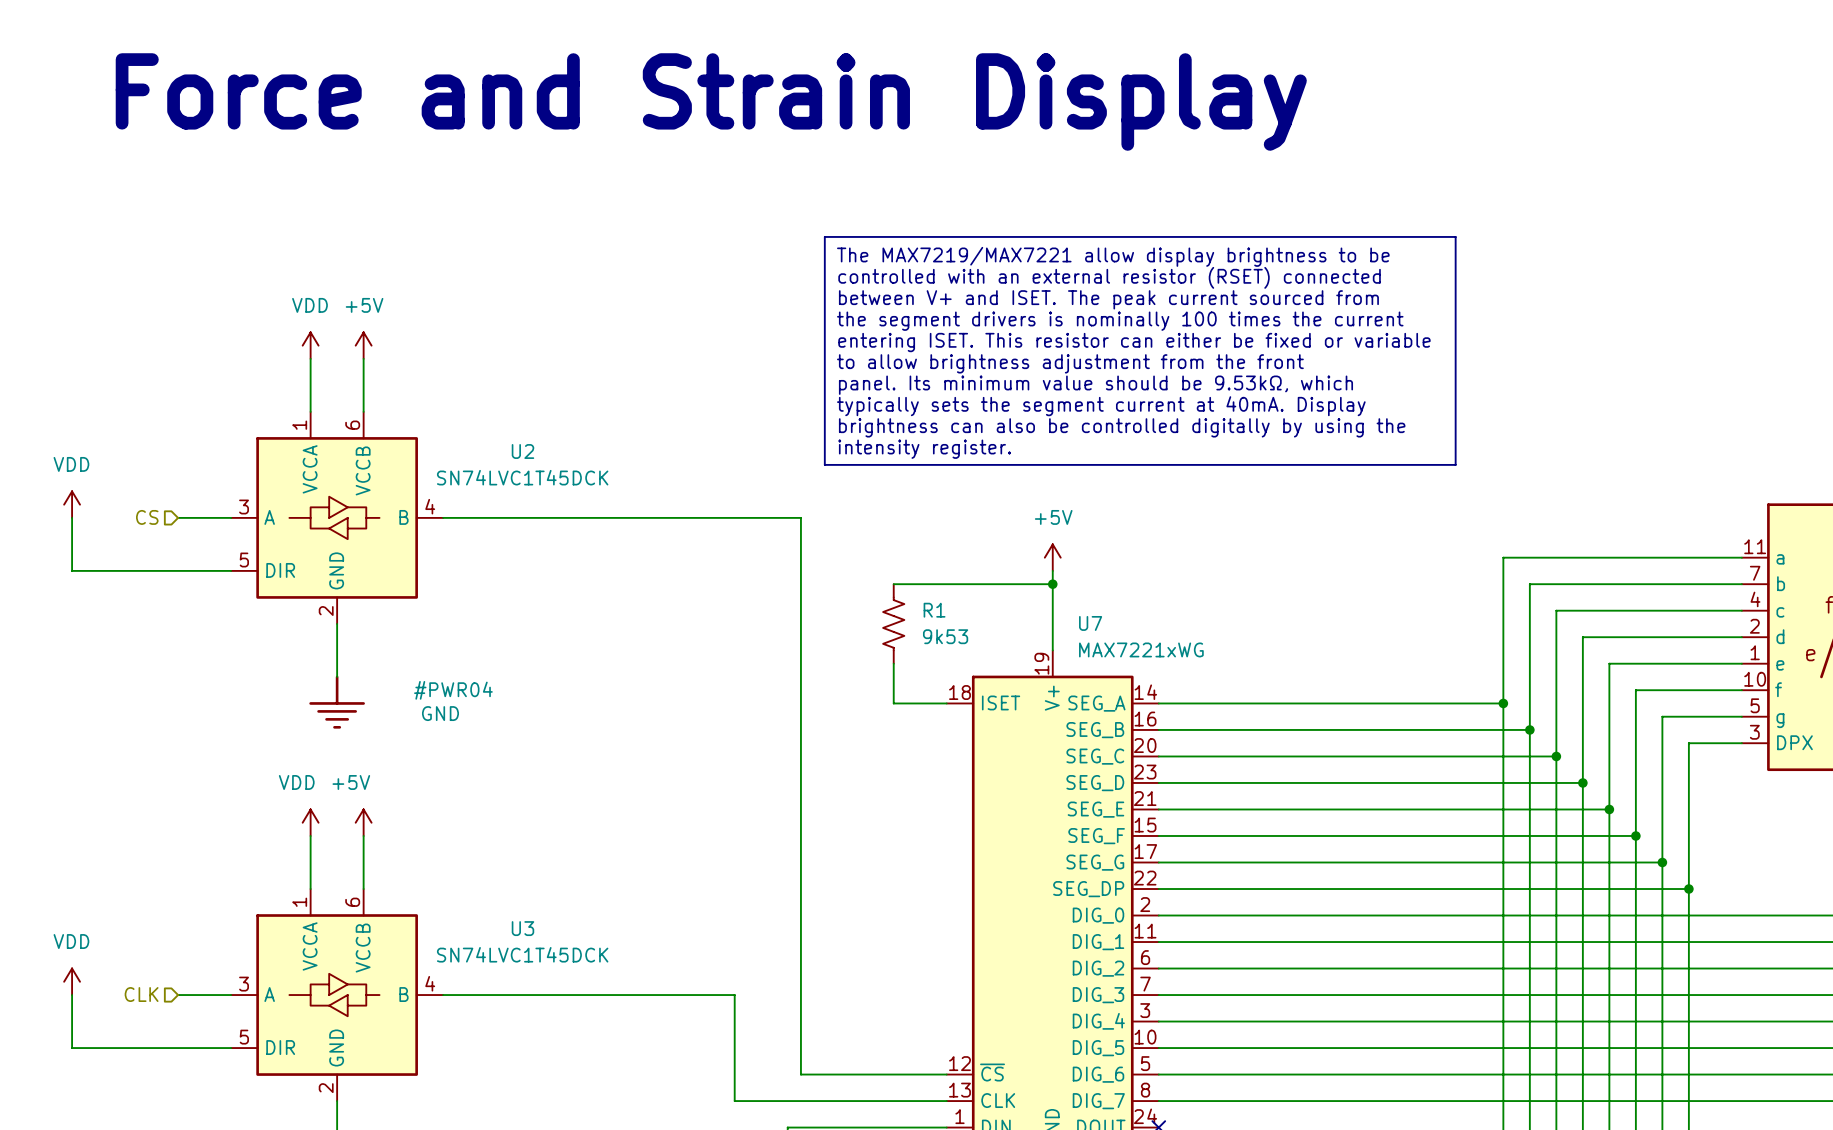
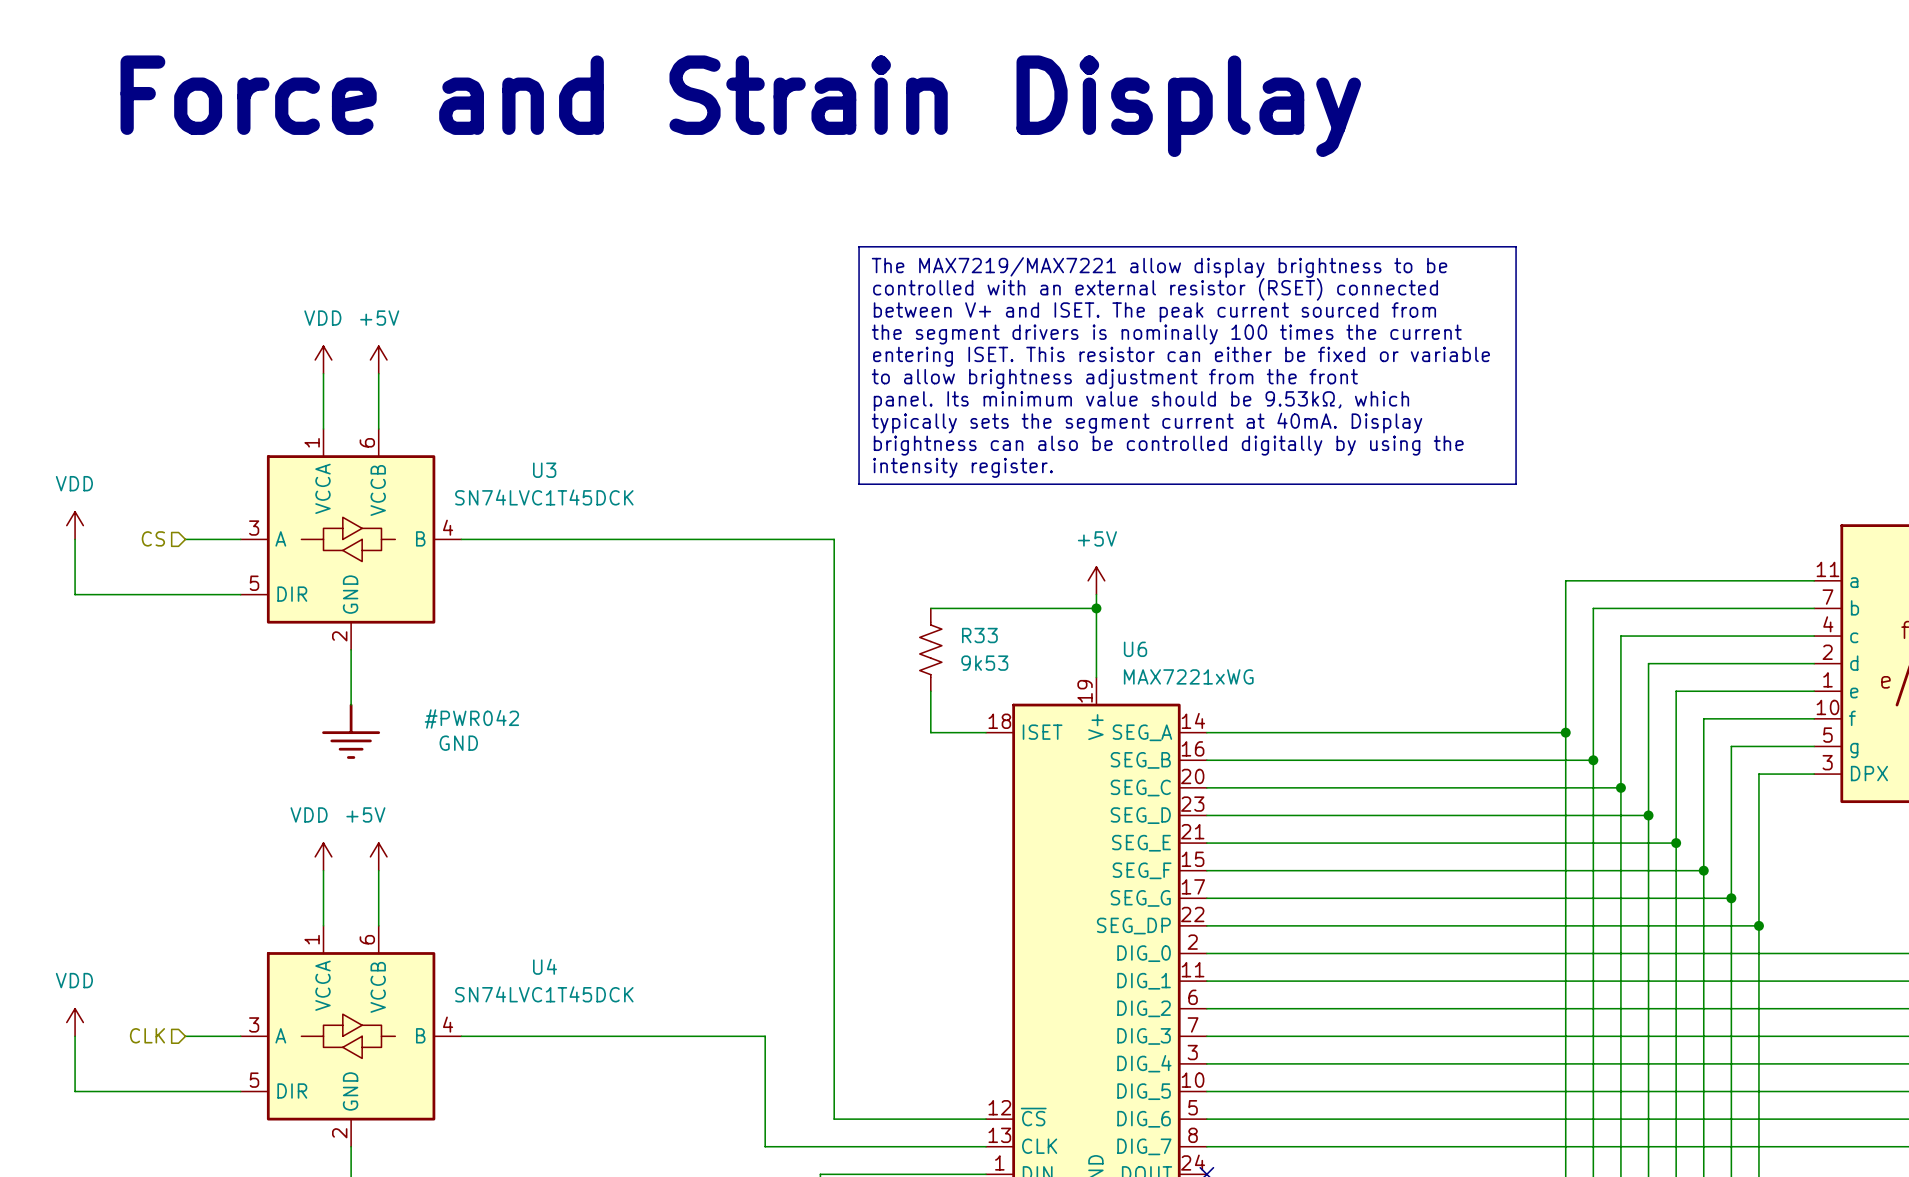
U2 name: U2 (522, 451) -> U3 (544, 470)
R1 name: R1 (934, 610) -> R33 (979, 635)
U7 name: U7 (1090, 623) -> U6 (1135, 649)
#PWR04 name: #PWR04 (453, 690) -> #PWR042 (471, 718)
U3 name: U3 (522, 928) -> U4 (545, 966)

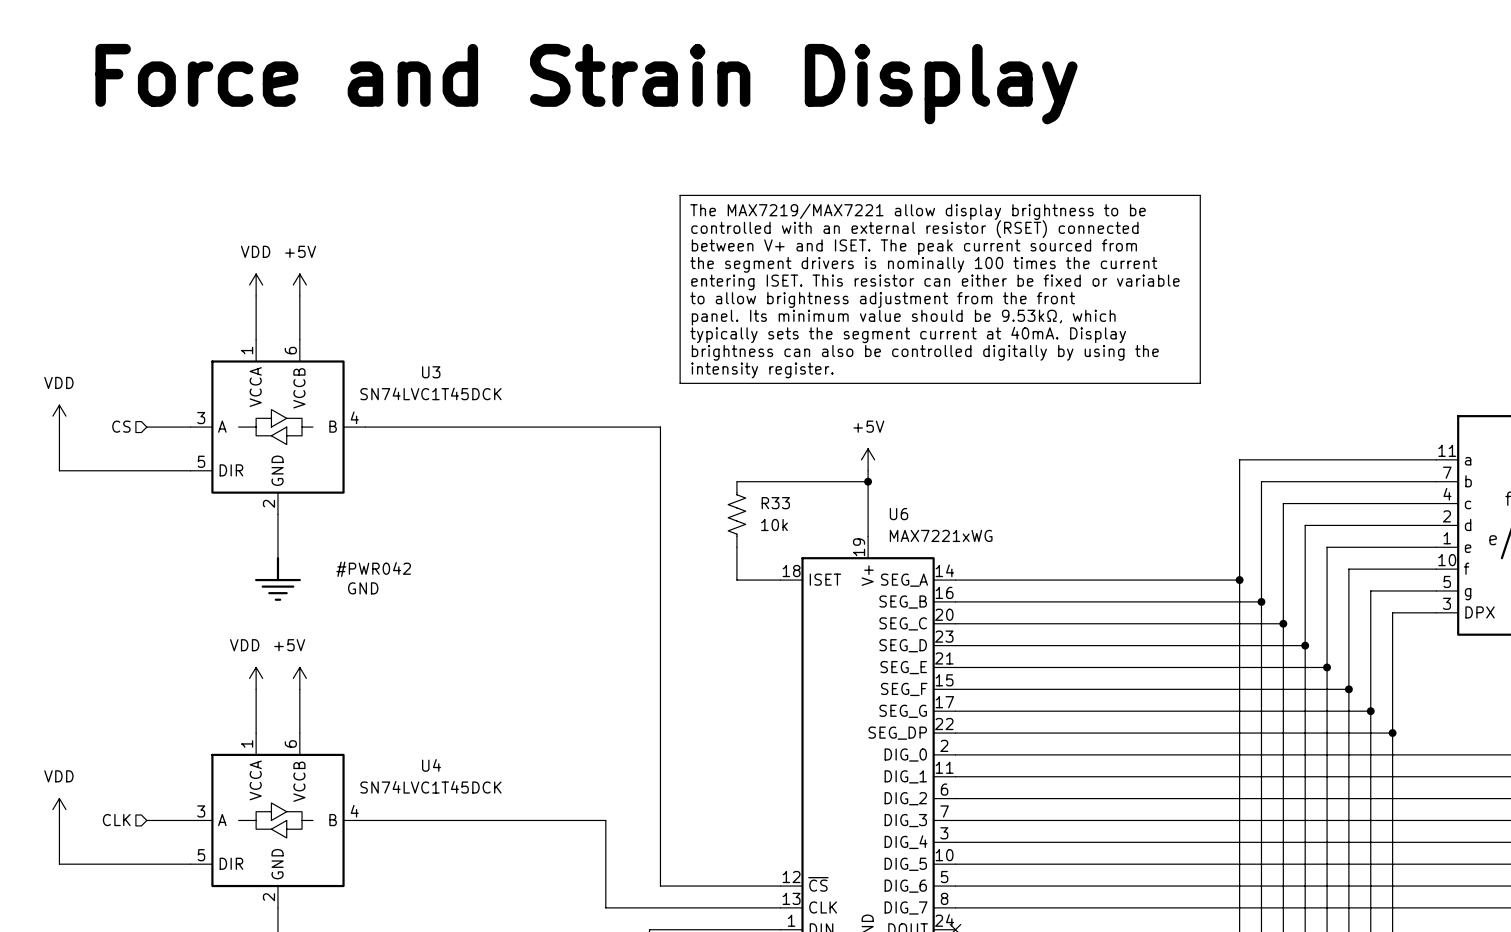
R33 value: 9k53 (984, 663) -> 10k (774, 525)

